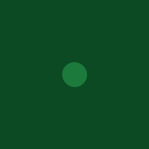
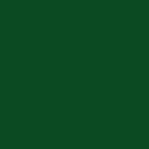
track: (74, 74) (74, 74) -> none

